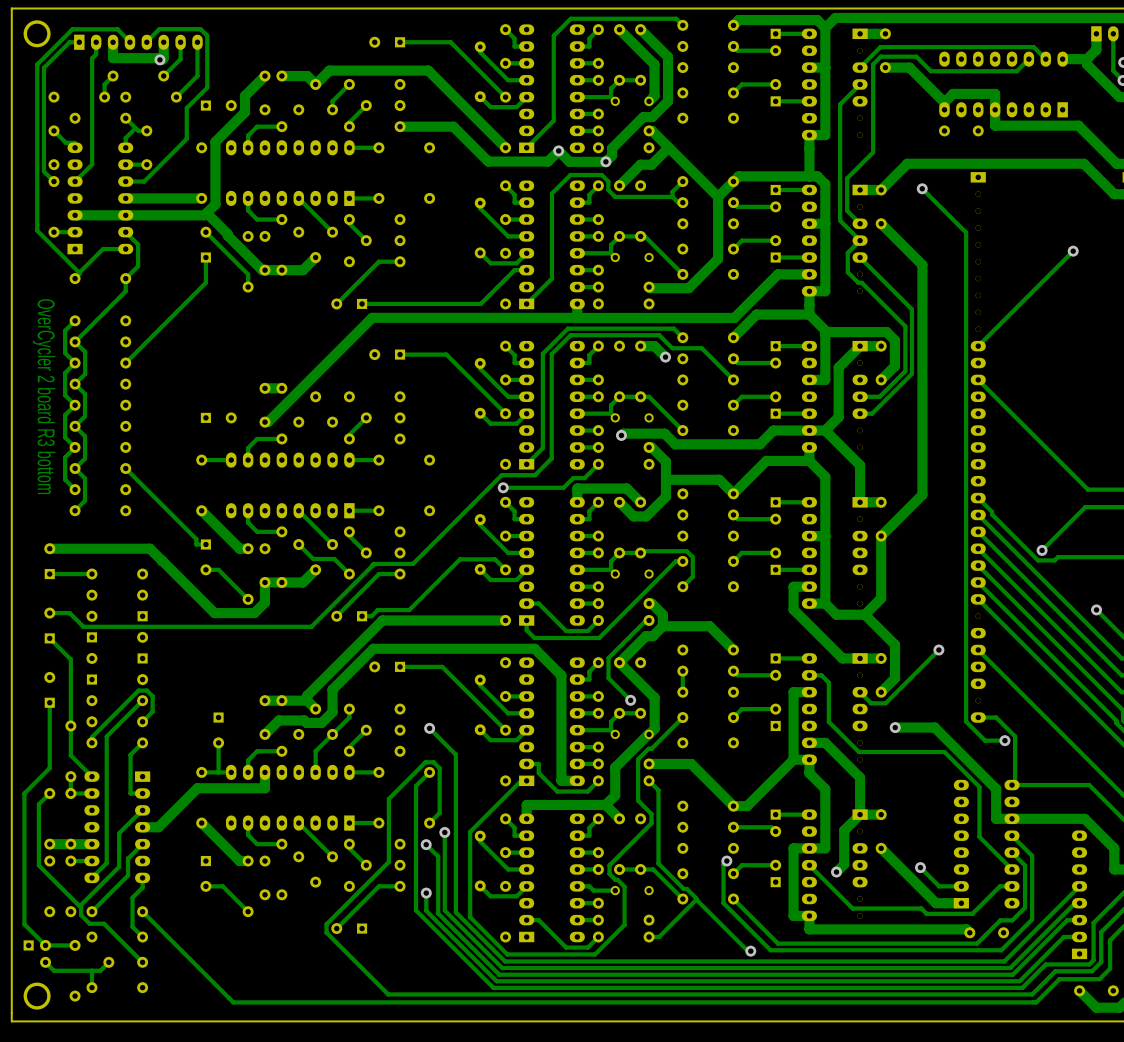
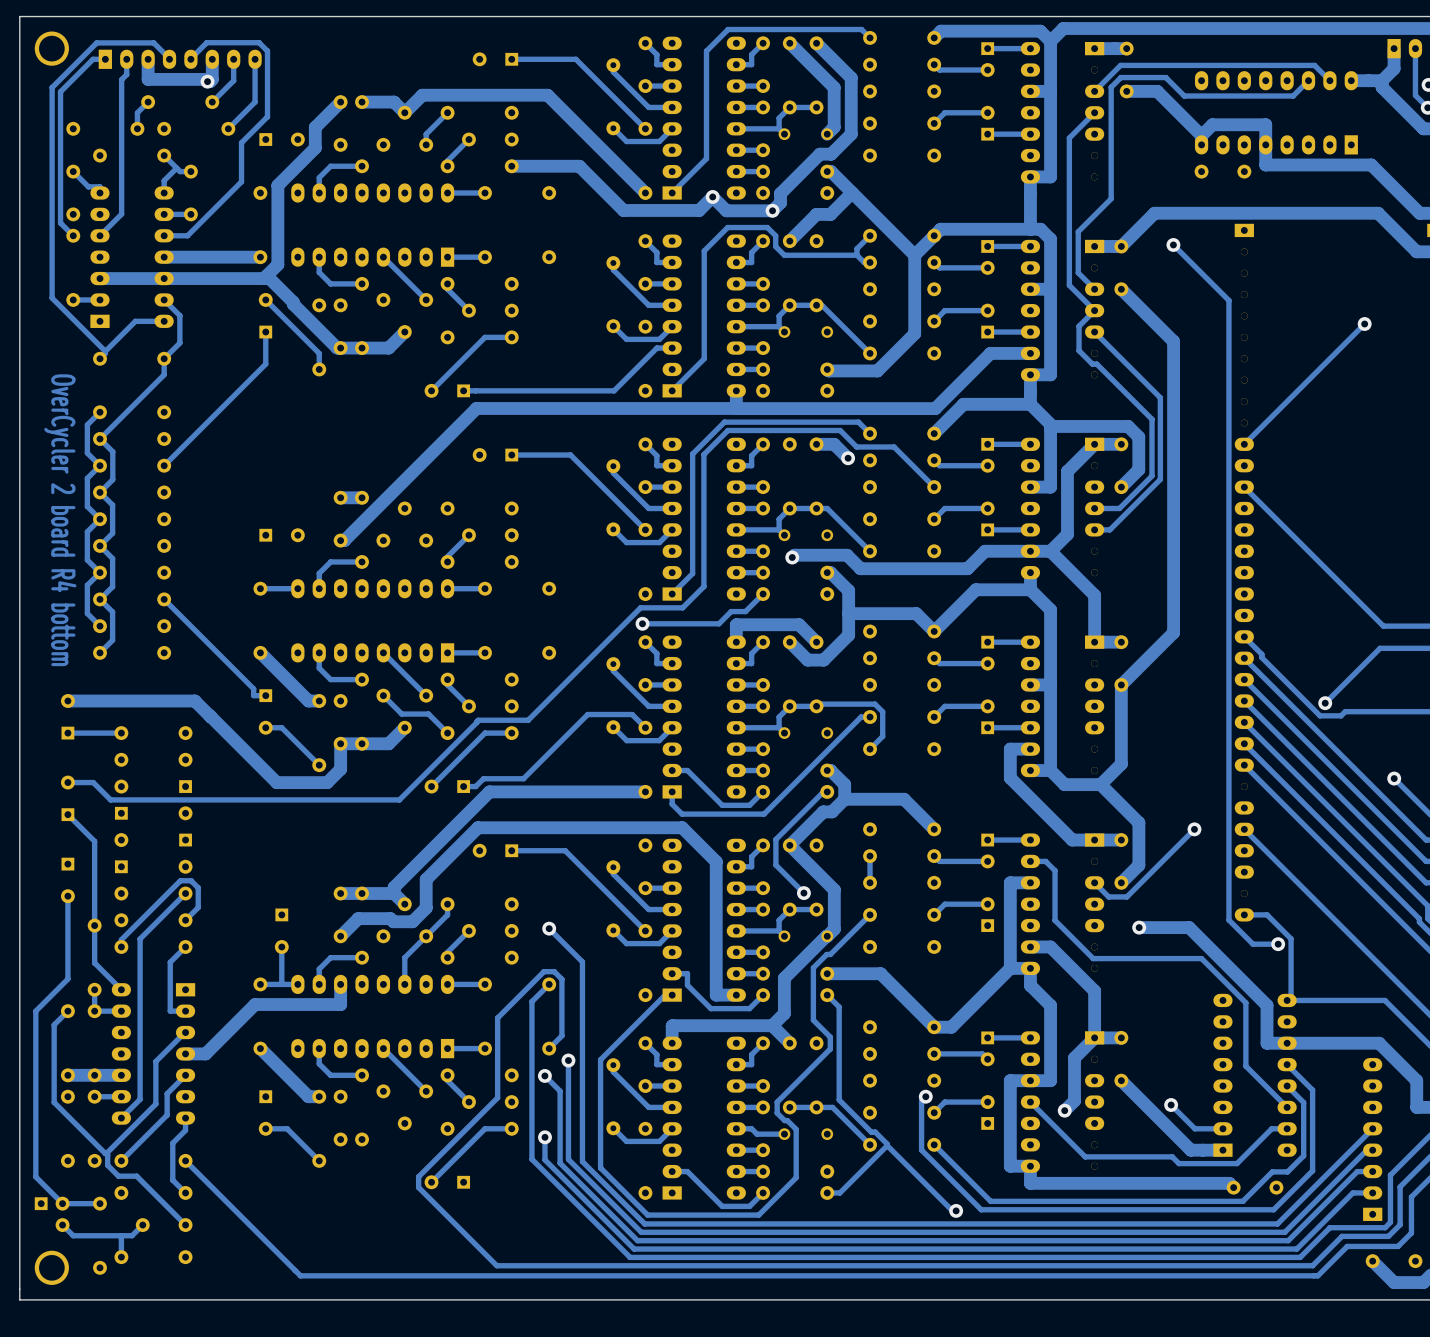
text: OverCycler 2 board R3 bottom (44, 396) -> OverCycler 2 board R4 bottom (60, 520)
part rotation: 0° (49, 689) -> 180° (67, 880)

